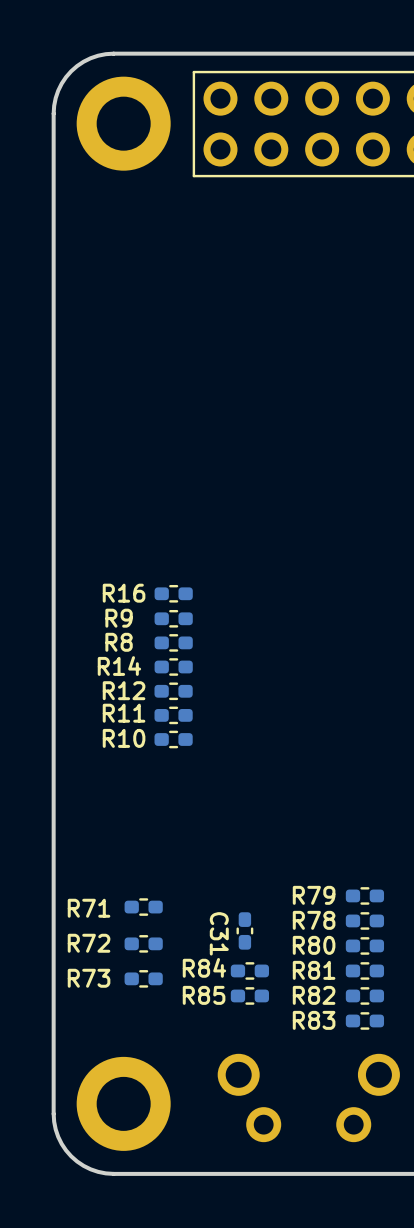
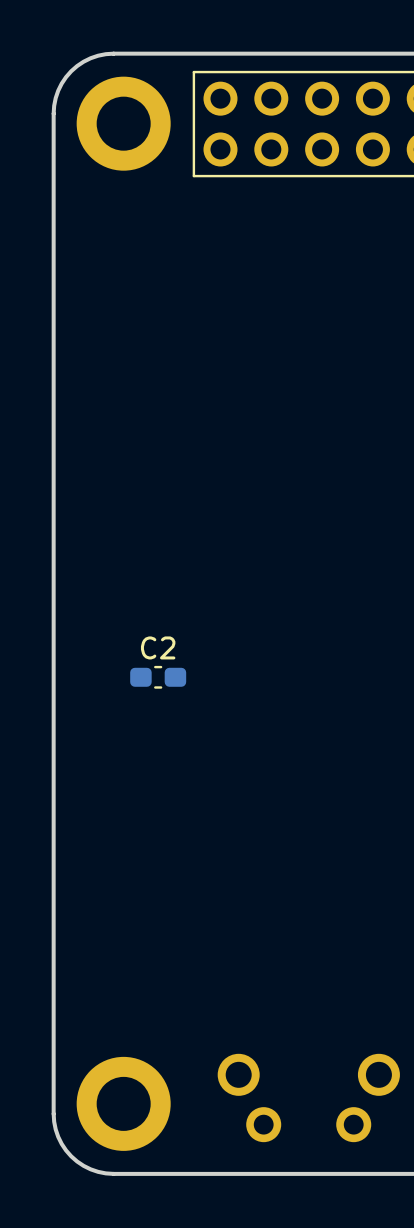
R16: (173, 593) -> none
R9: (173, 618) -> none
R8: (173, 642) -> none
R14: (173, 666) -> none
C2: none -> (158, 677)
R12: (173, 691) -> none
R11: (173, 715) -> none
R10: (173, 739) -> none
R79: (364, 895) -> none
R71: (143, 907) -> none
R78: (364, 920) -> none
C31: (244, 930) -> none
R72: (143, 943) -> none
R80: (364, 945) -> none
R84: (249, 970) -> none
R81: (364, 970) -> none
R73: (143, 978) -> none
R85: (249, 995) -> none
R82: (364, 995) -> none
R83: (364, 1020) -> none

